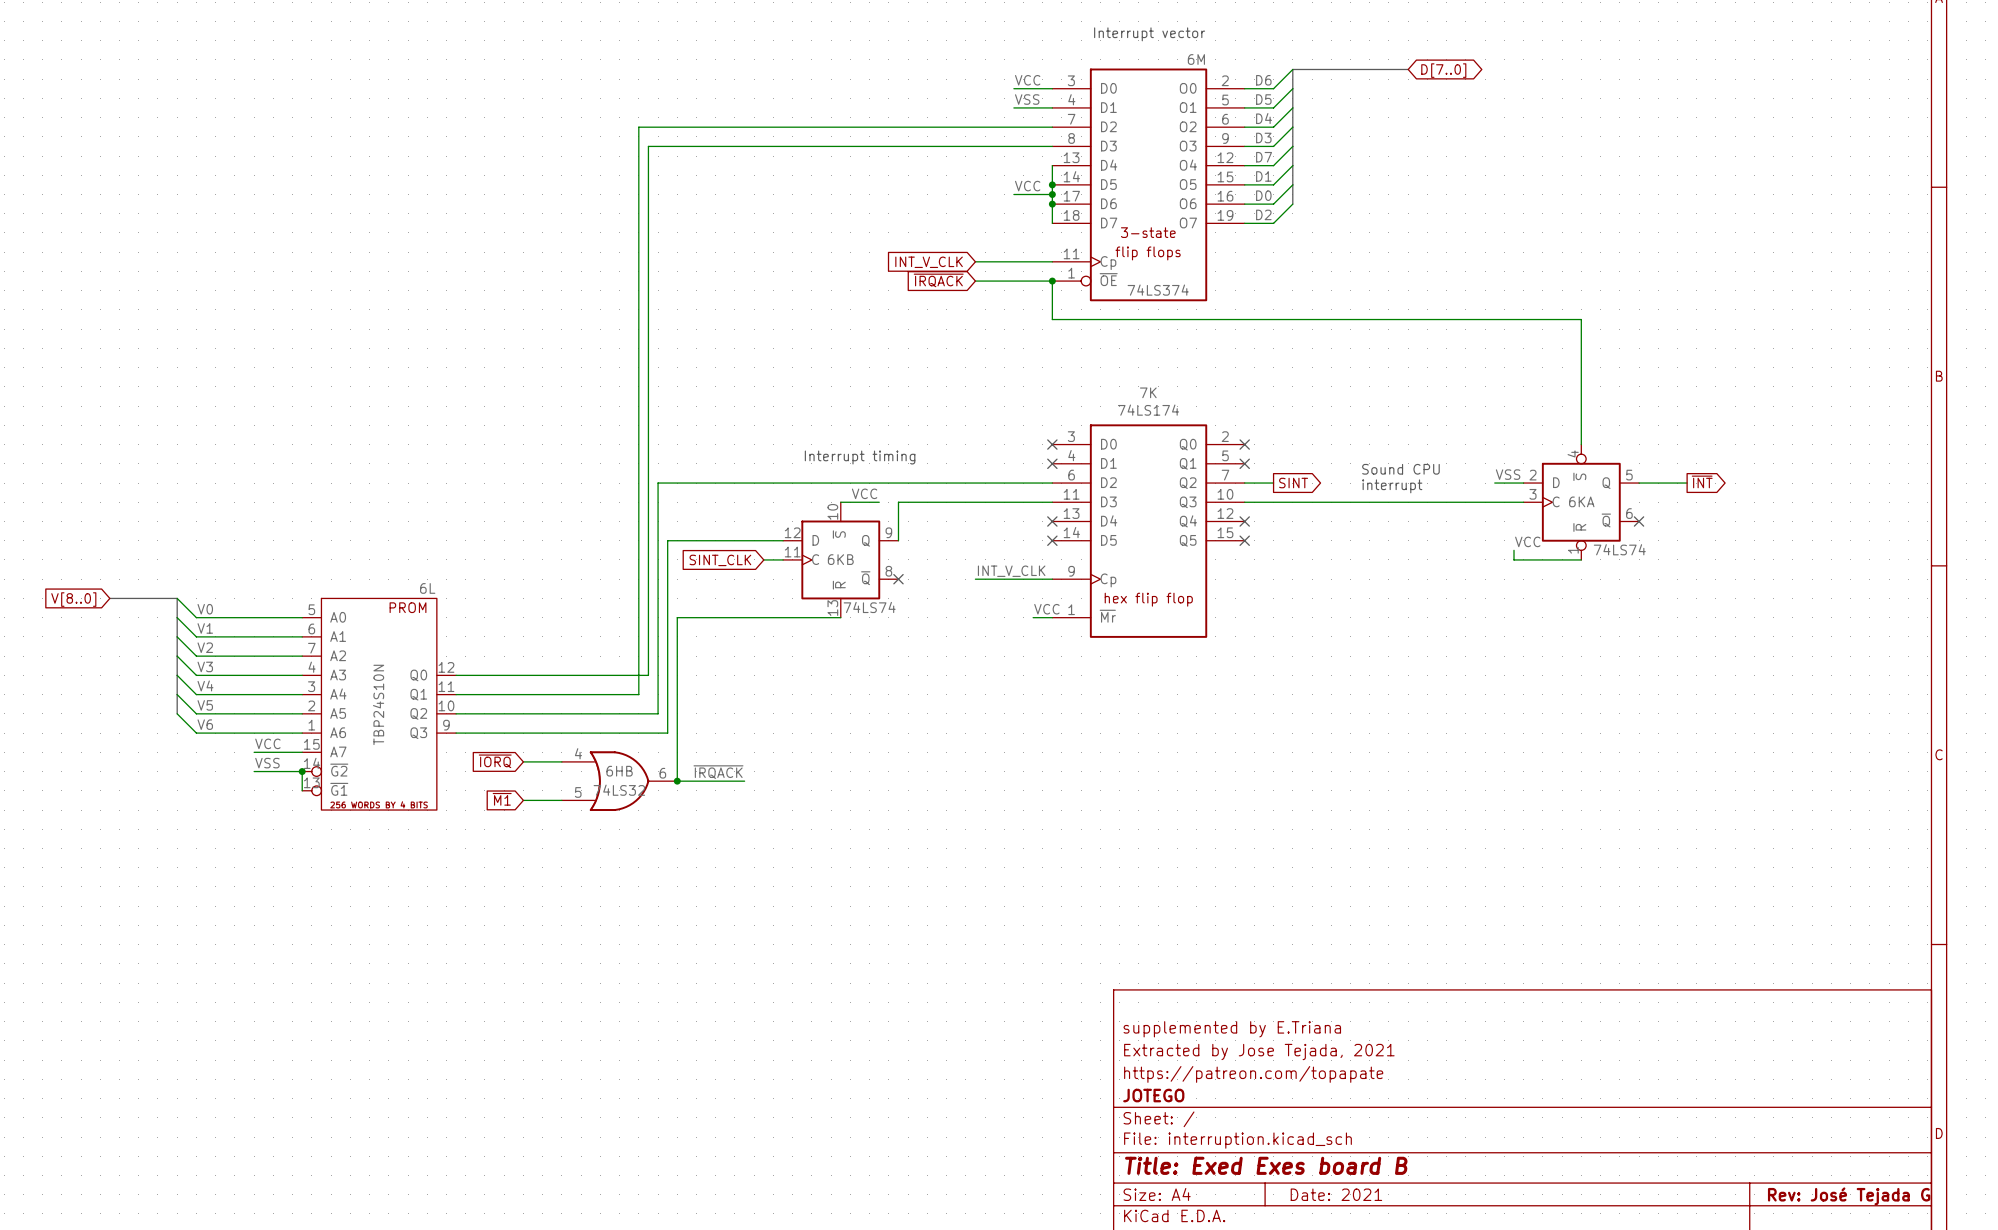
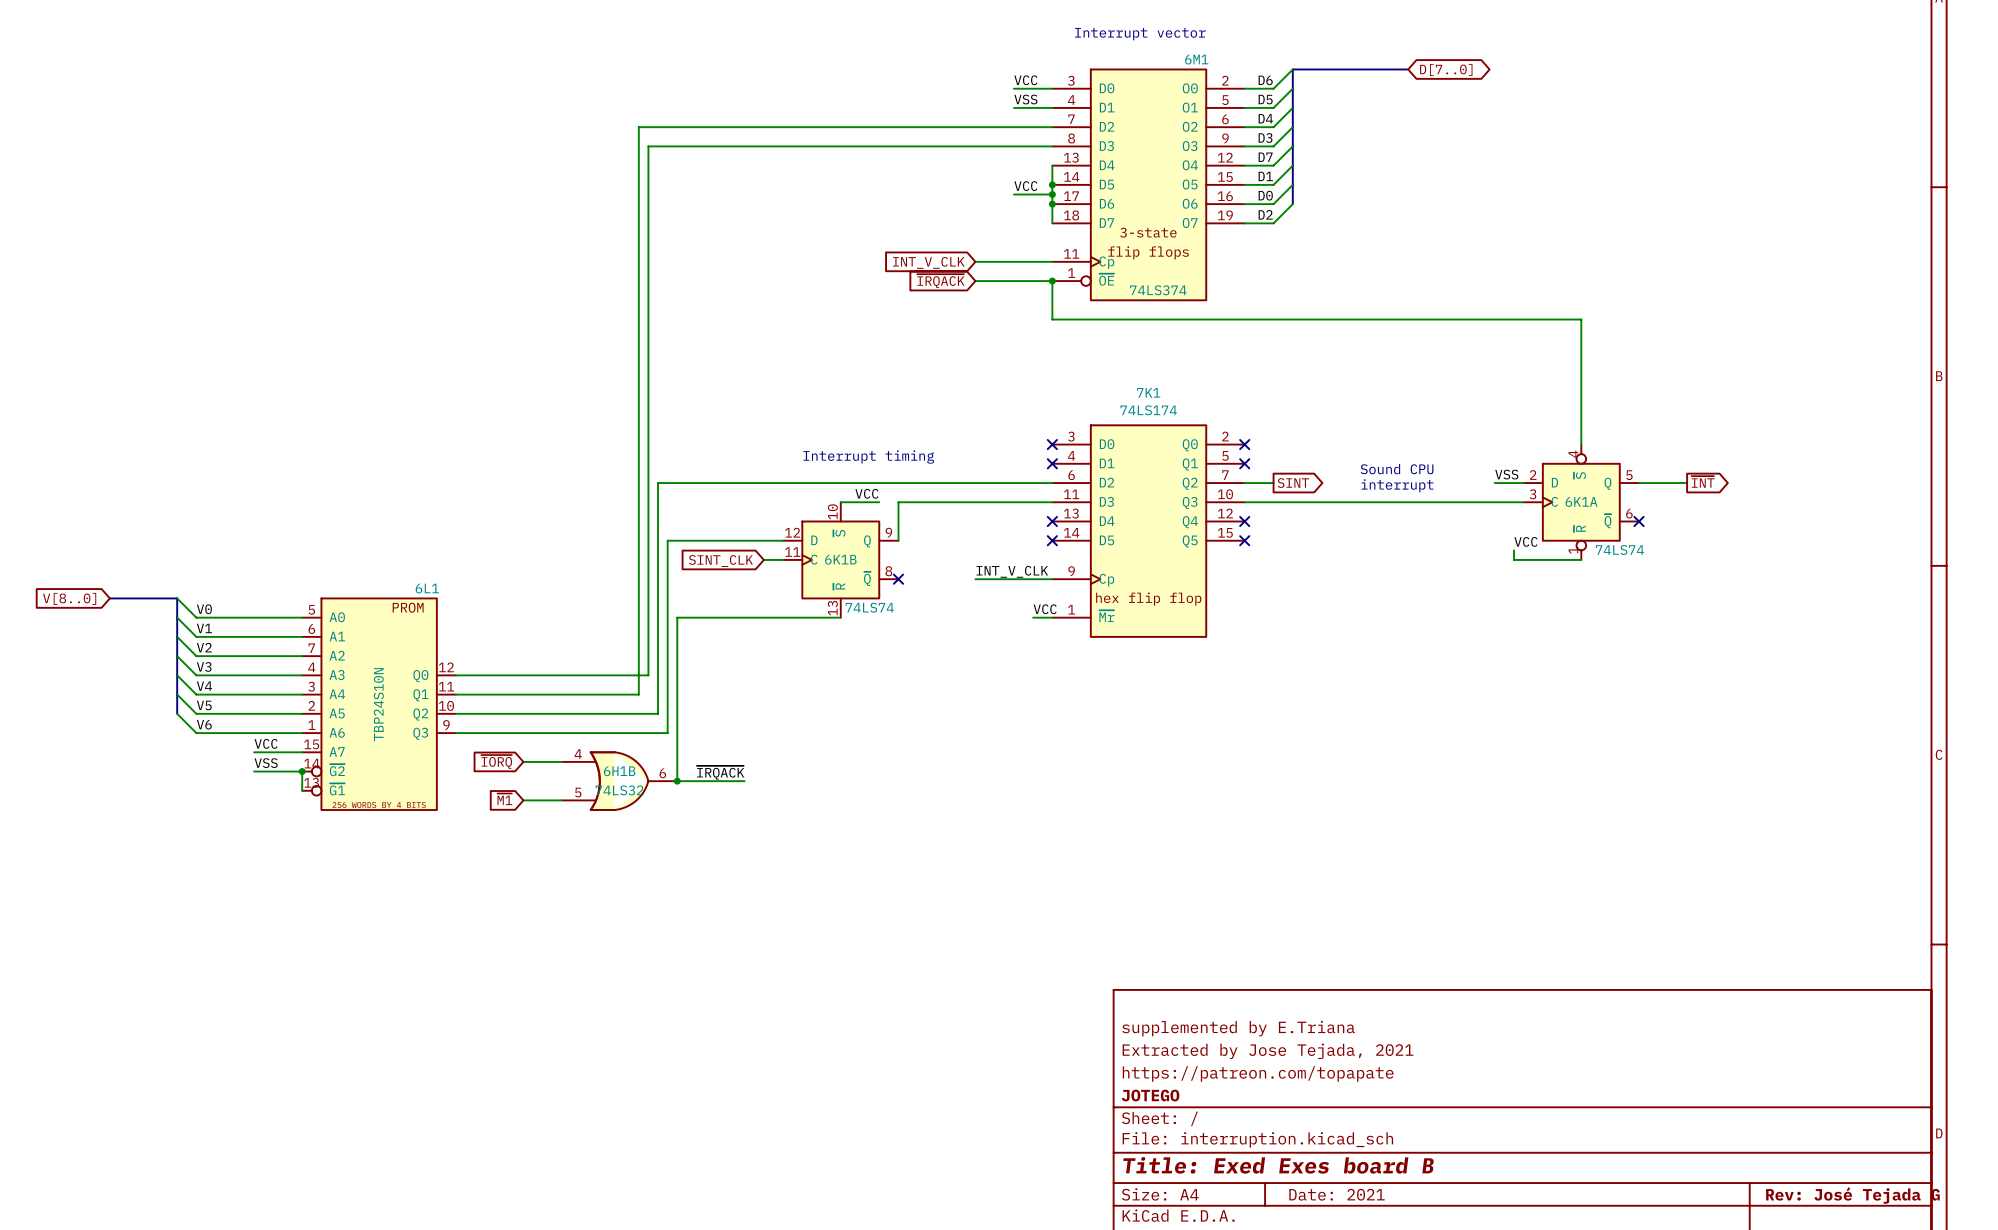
6M name: 6M (1196, 59) -> 6M1 (1196, 59)
7K name: 7K (1148, 392) -> 7K1 (1148, 392)
6KA name: 6KA (1581, 501) -> 6K1A (1581, 501)
6KB name: 6KB (840, 559) -> 6K1B (840, 559)
6L name: 6L (427, 588) -> 6L1 (427, 588)
6HB name: 6HB (619, 771) -> 6H1B (619, 771)

